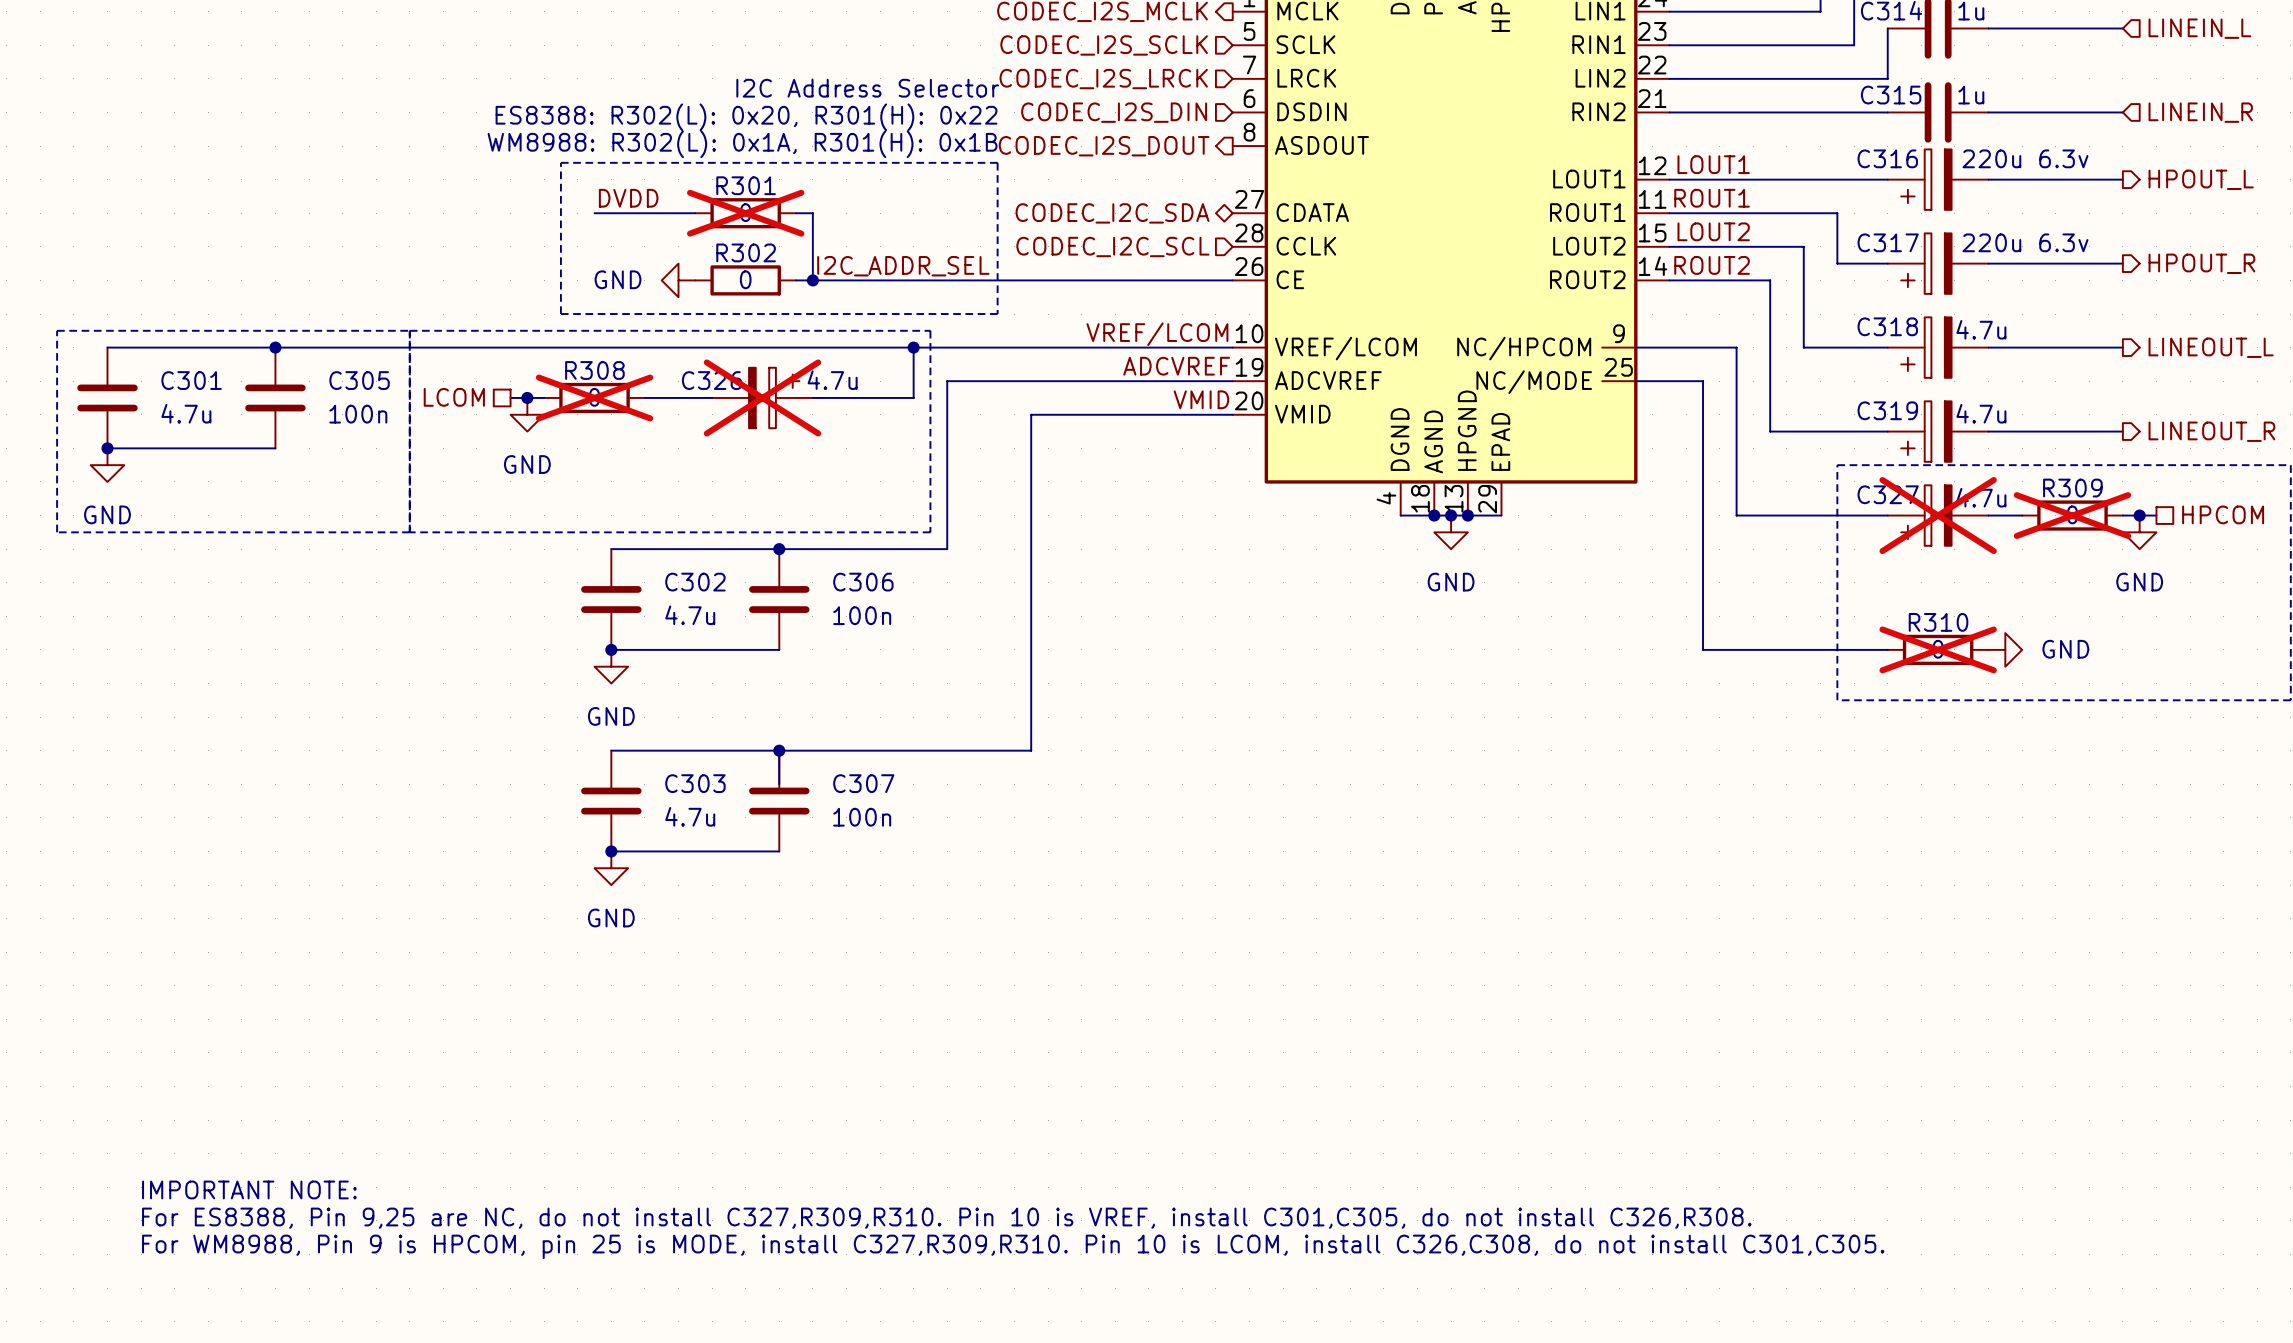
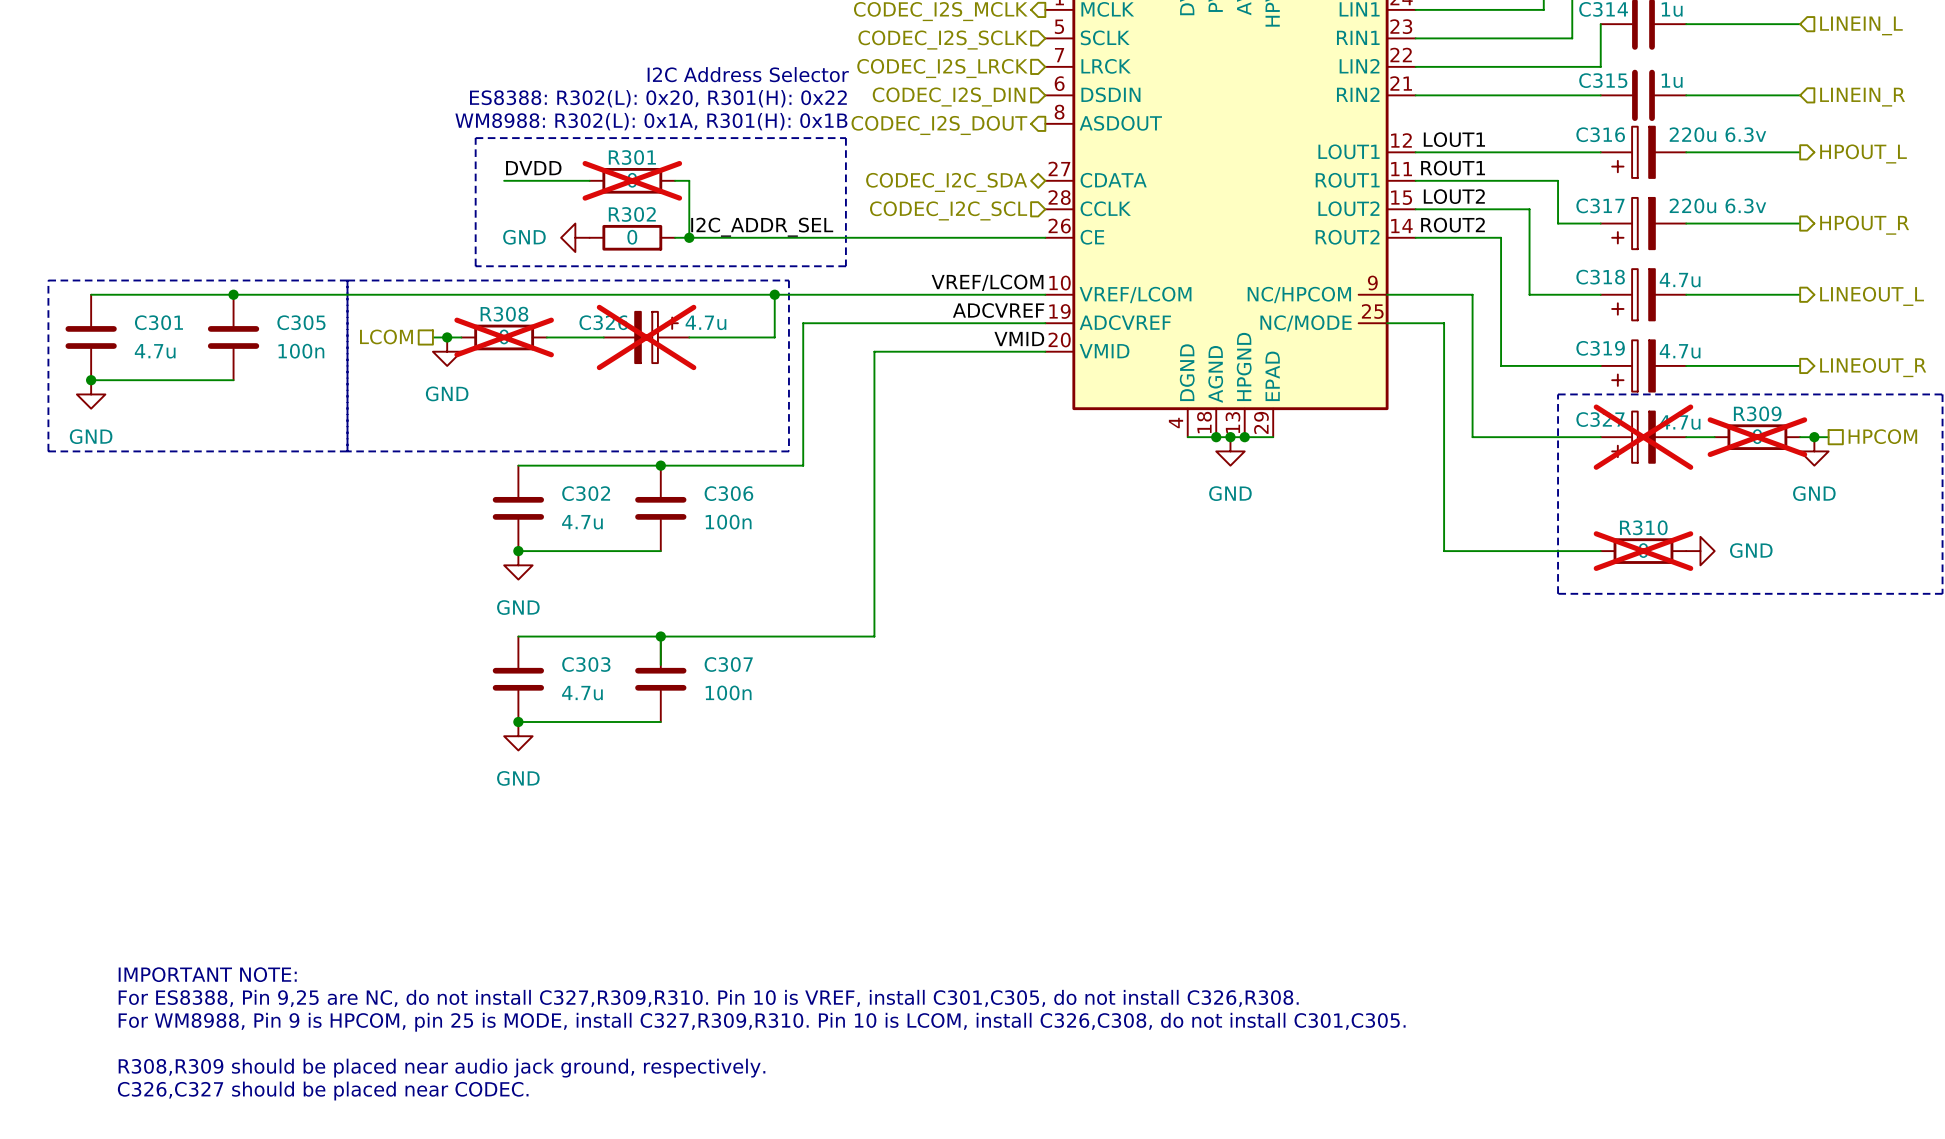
text position: IMPORTANT NOTE: (249, 1189) -> IMPORTANT NOTE: (207, 974)
text position: For ES8388, Pin 9,25 are NC, do not install C327,R309,R310. Pin 10 is VREF, install C301,C305, do not install C326,R308. (946, 1218) -> For ES8388, Pin 9,25 are NC, do not install C327,R309,R310. Pin 10 is VREF, install C301,C305, do not install C326,R308. (708, 998)
text position: For WM8988, Pin 9 is HPCOM, pin 25 is MODE, install C327,R309,R310. Pin 10 is LCOM, install C326,C308, do not install C301,C305. (1013, 1246) -> For WM8988, Pin 9 is HPCOM, pin 25 is MODE, install C327,R309,R310. Pin 10 is LCOM, install C326,C308, do not install C301,C305. (762, 1022)
text: none -> R308,R309 should be placed near audio jack ground, respectively. (442, 1068)
text: none -> C326,C327 should be placed near CODEC. (323, 1091)

